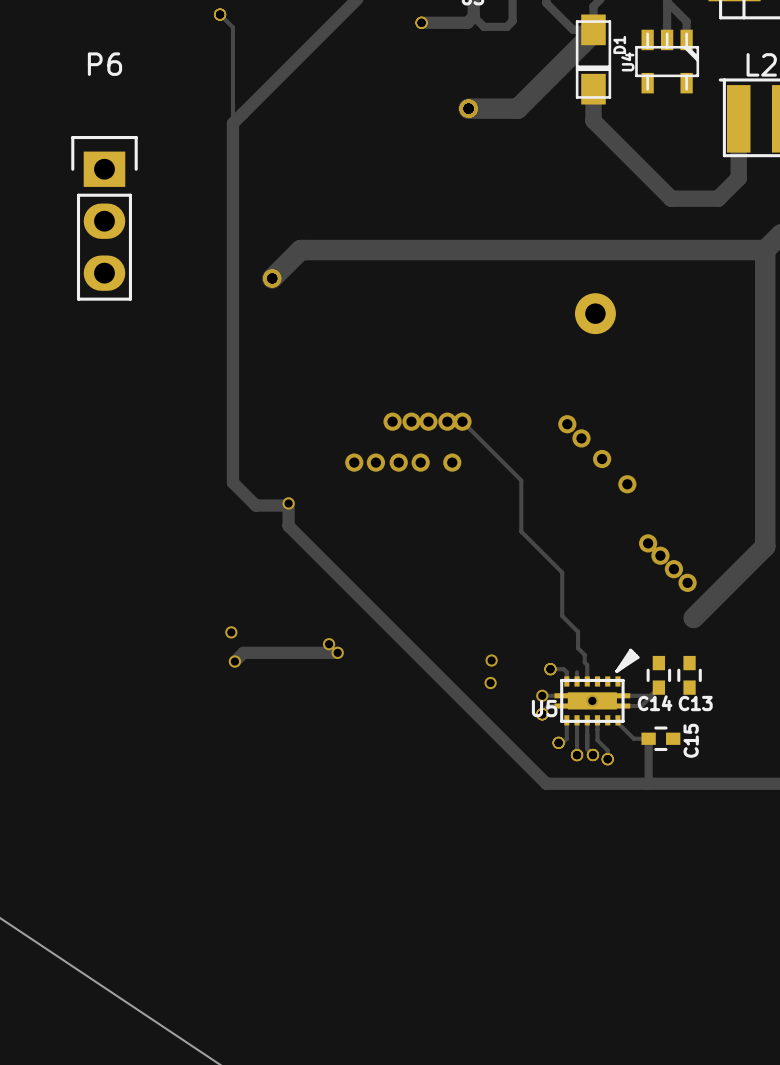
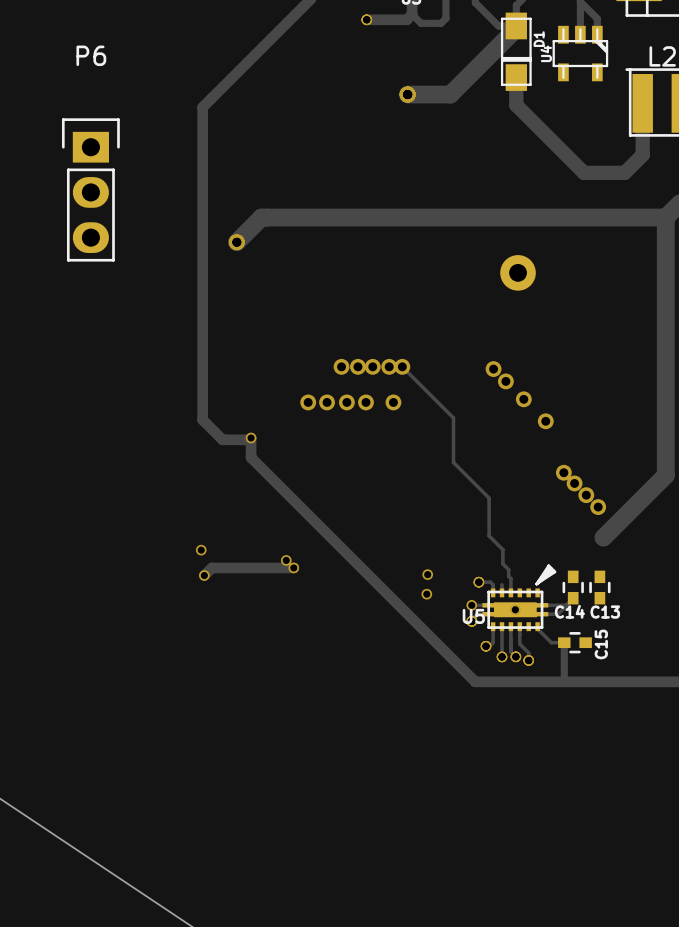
track: (220, 14) (232, 27) (232, 123) -> none
via: (220, 14) -> none

